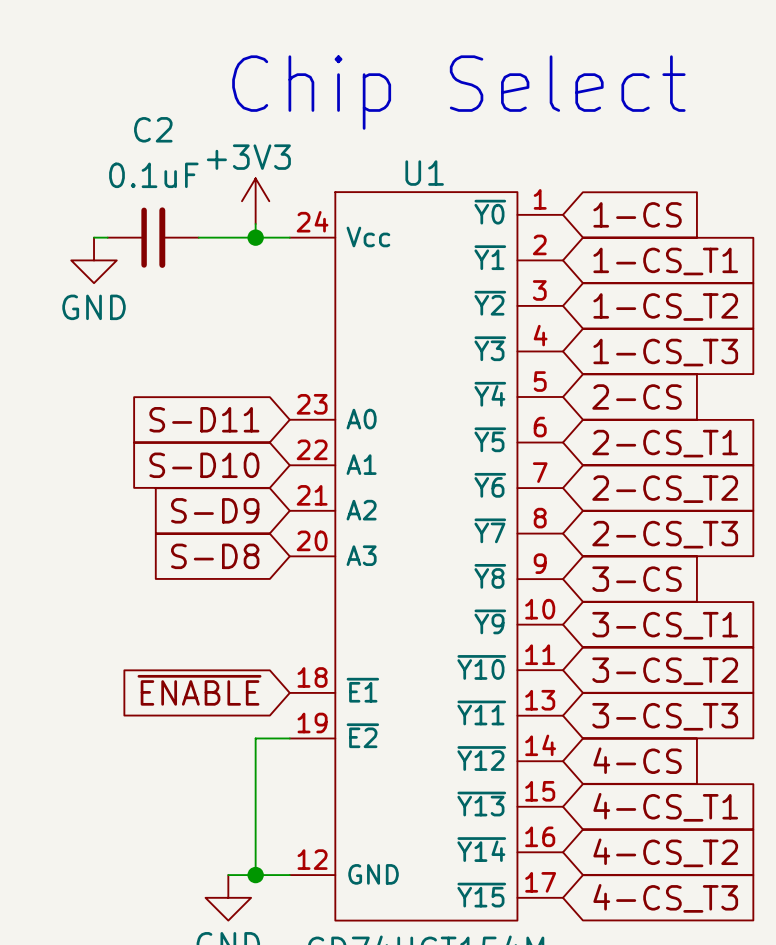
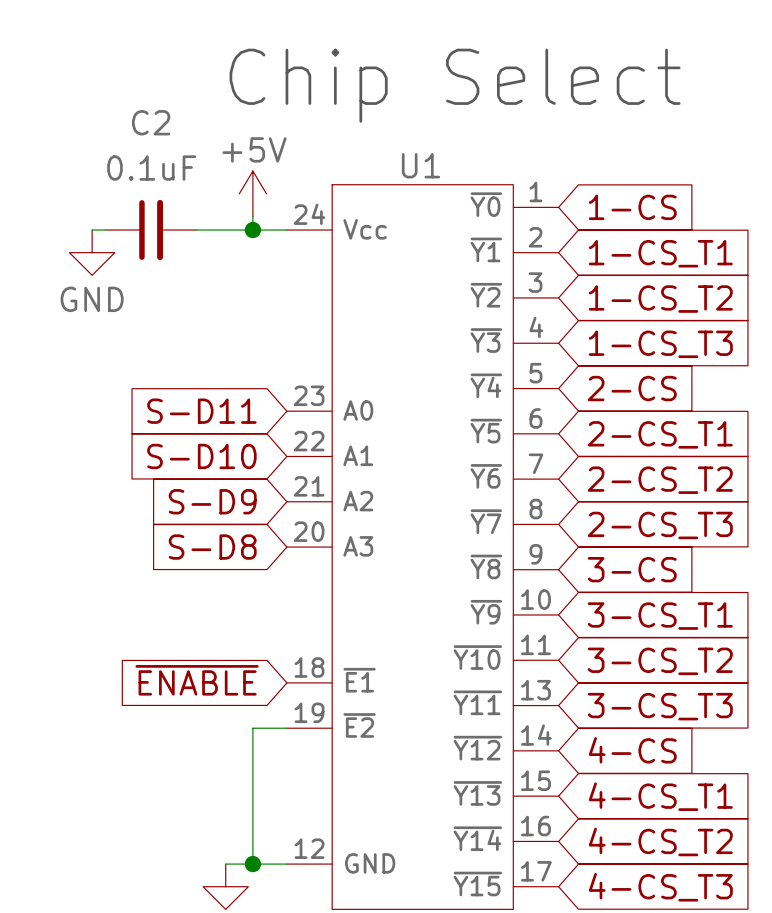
power symbol: +3V3 (255, 201) -> +5V (252, 193)

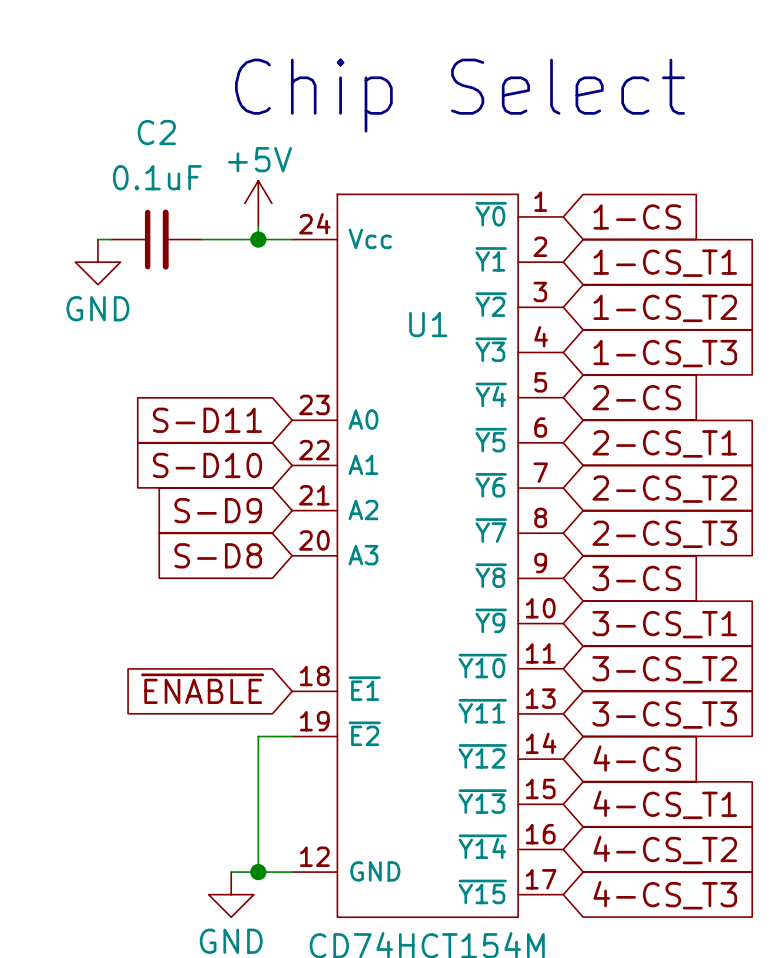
U1 name position: U1 (421, 165) -> U1 (428, 324)

